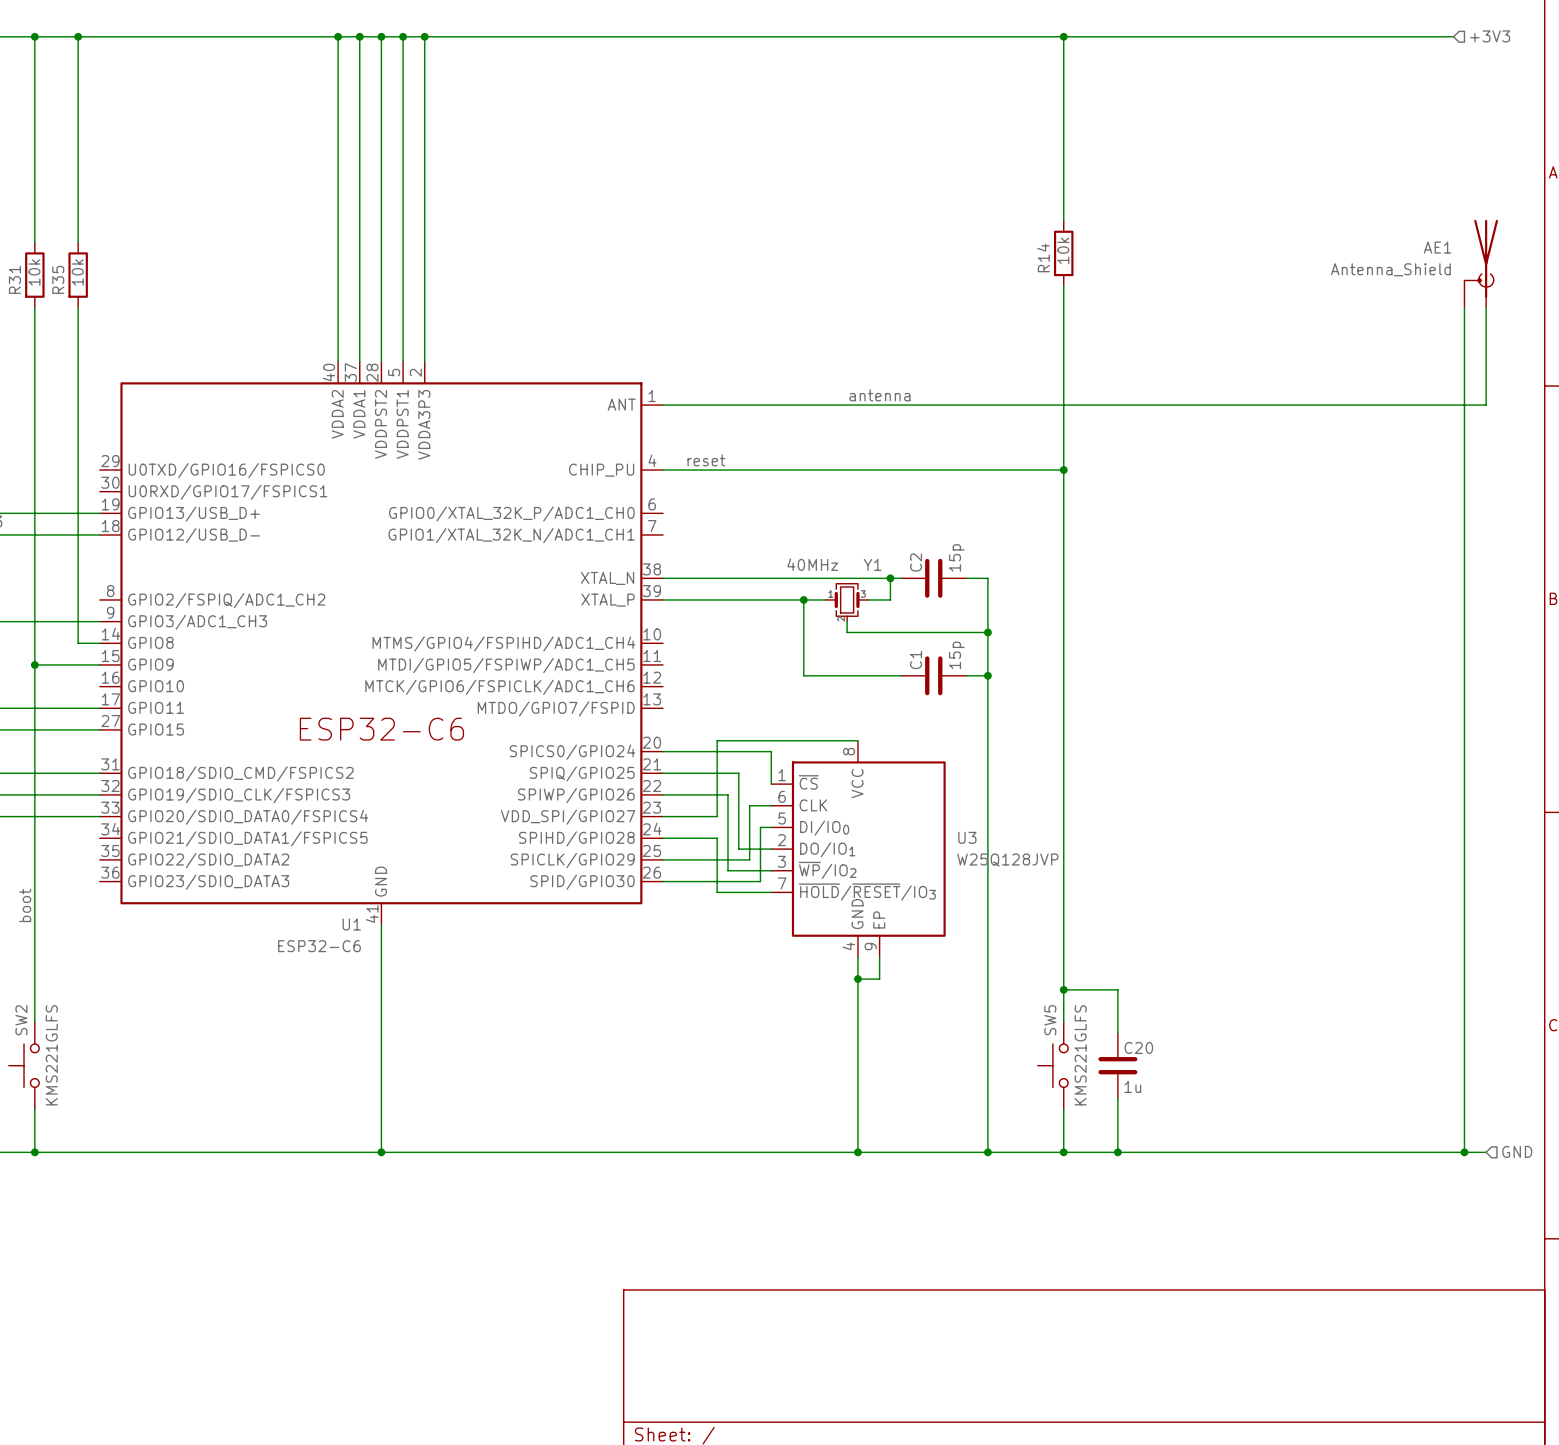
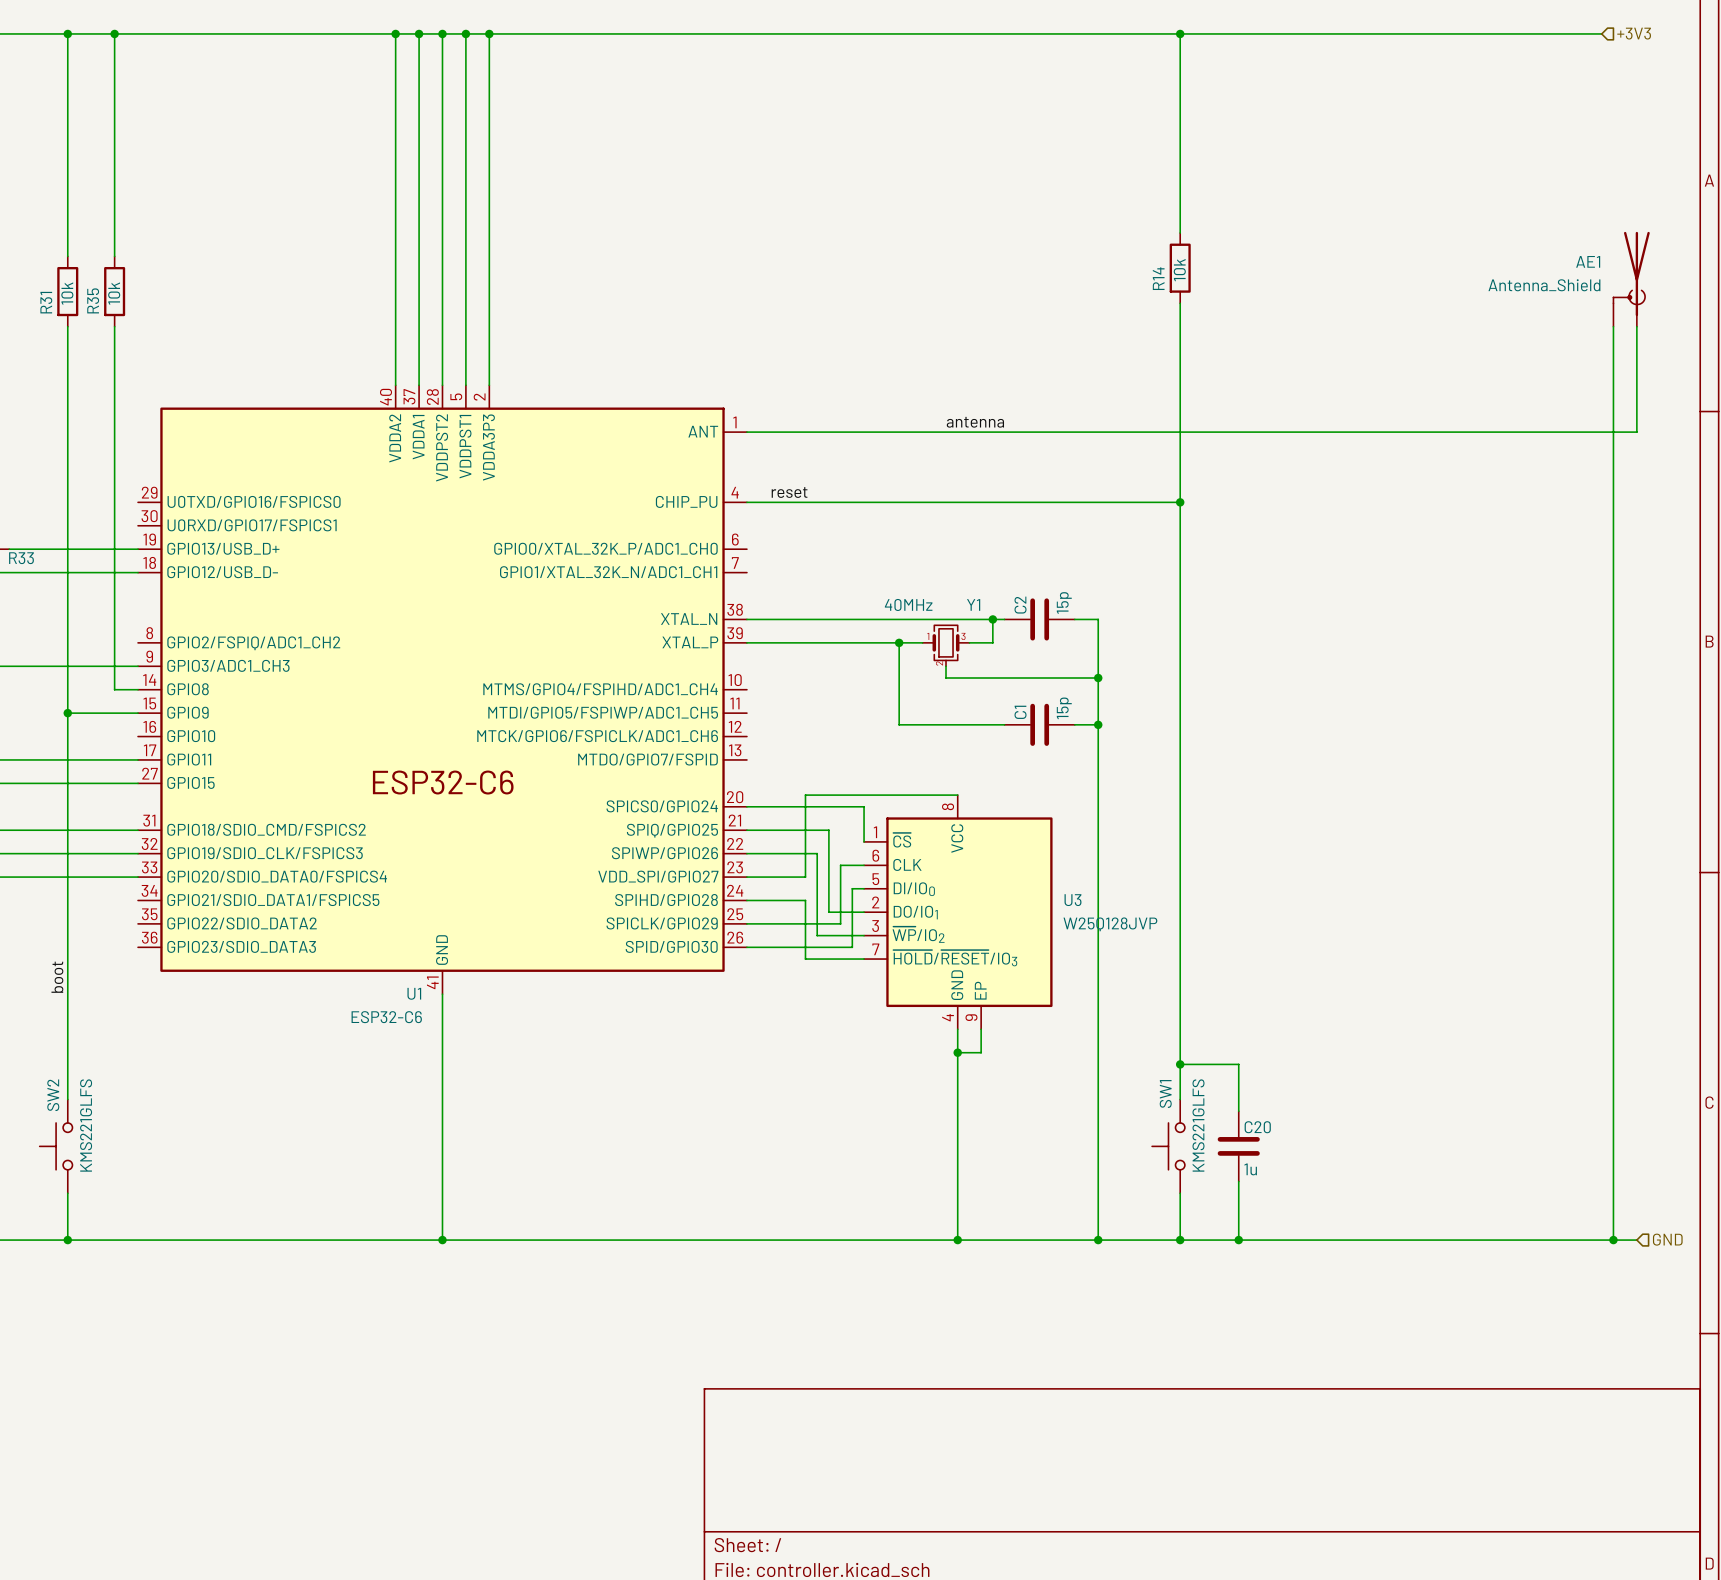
SW5 name: SW5 (1050, 1020) -> SW1 (1165, 1093)

